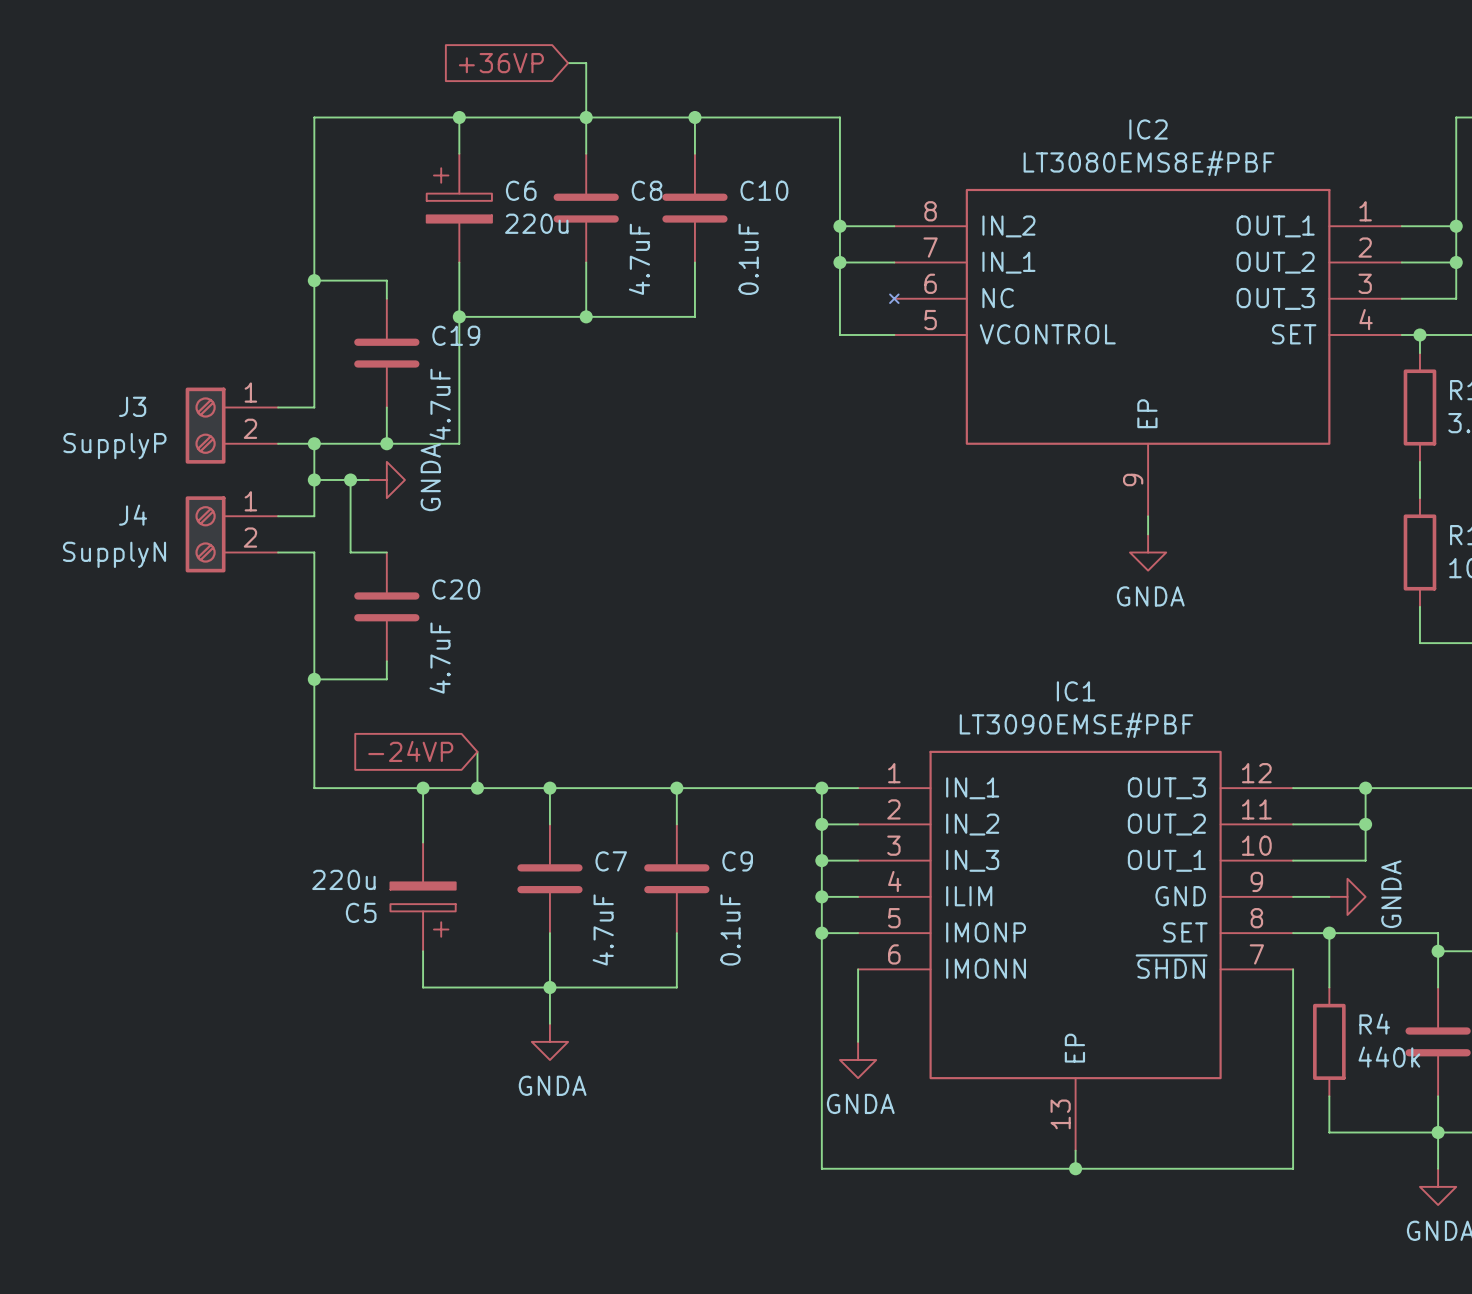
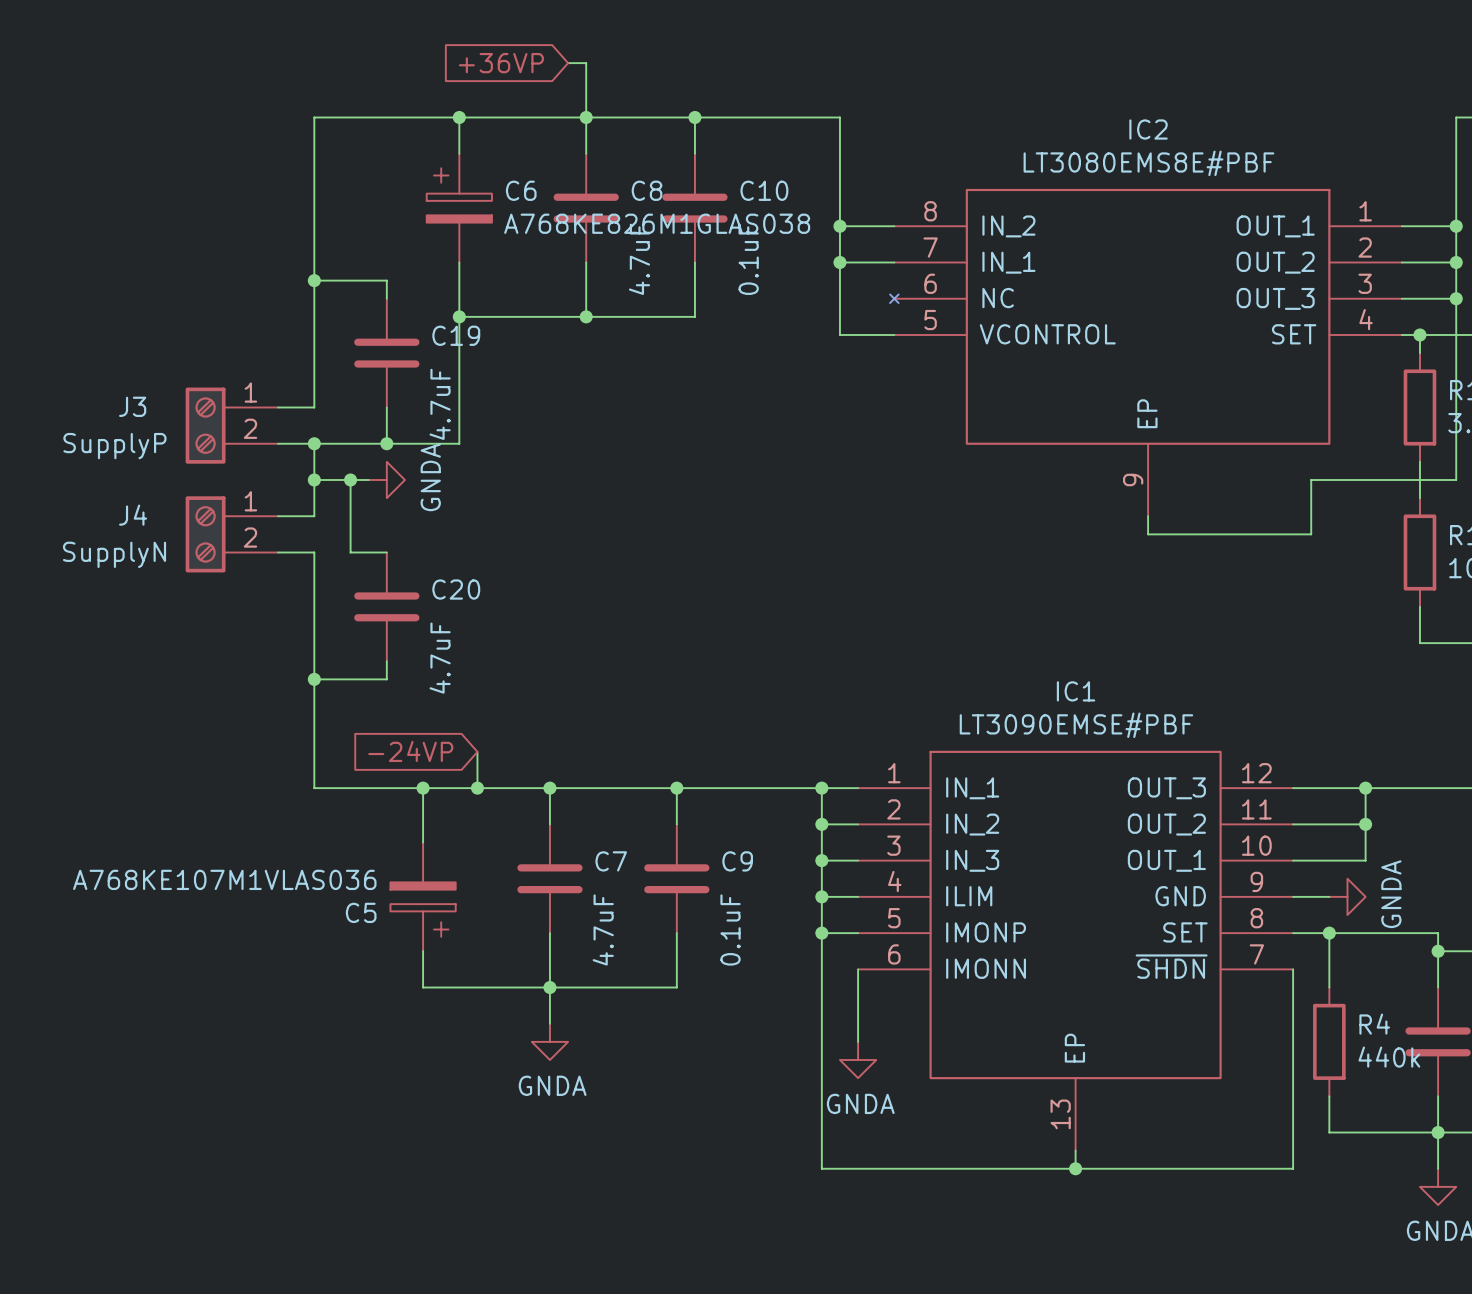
C6 value: 220u (536, 223) -> A768KE826M1GLAS038 (657, 223)
wire: none -> (1456, 298) (1456, 479) (1311, 479) (1311, 534) (1148, 534)
junction: none -> (1456, 298)
power symbol: GNDA (1148, 552) -> none
C5 value: 220u (343, 879) -> A768KE107M1VLAS036 (224, 879)

